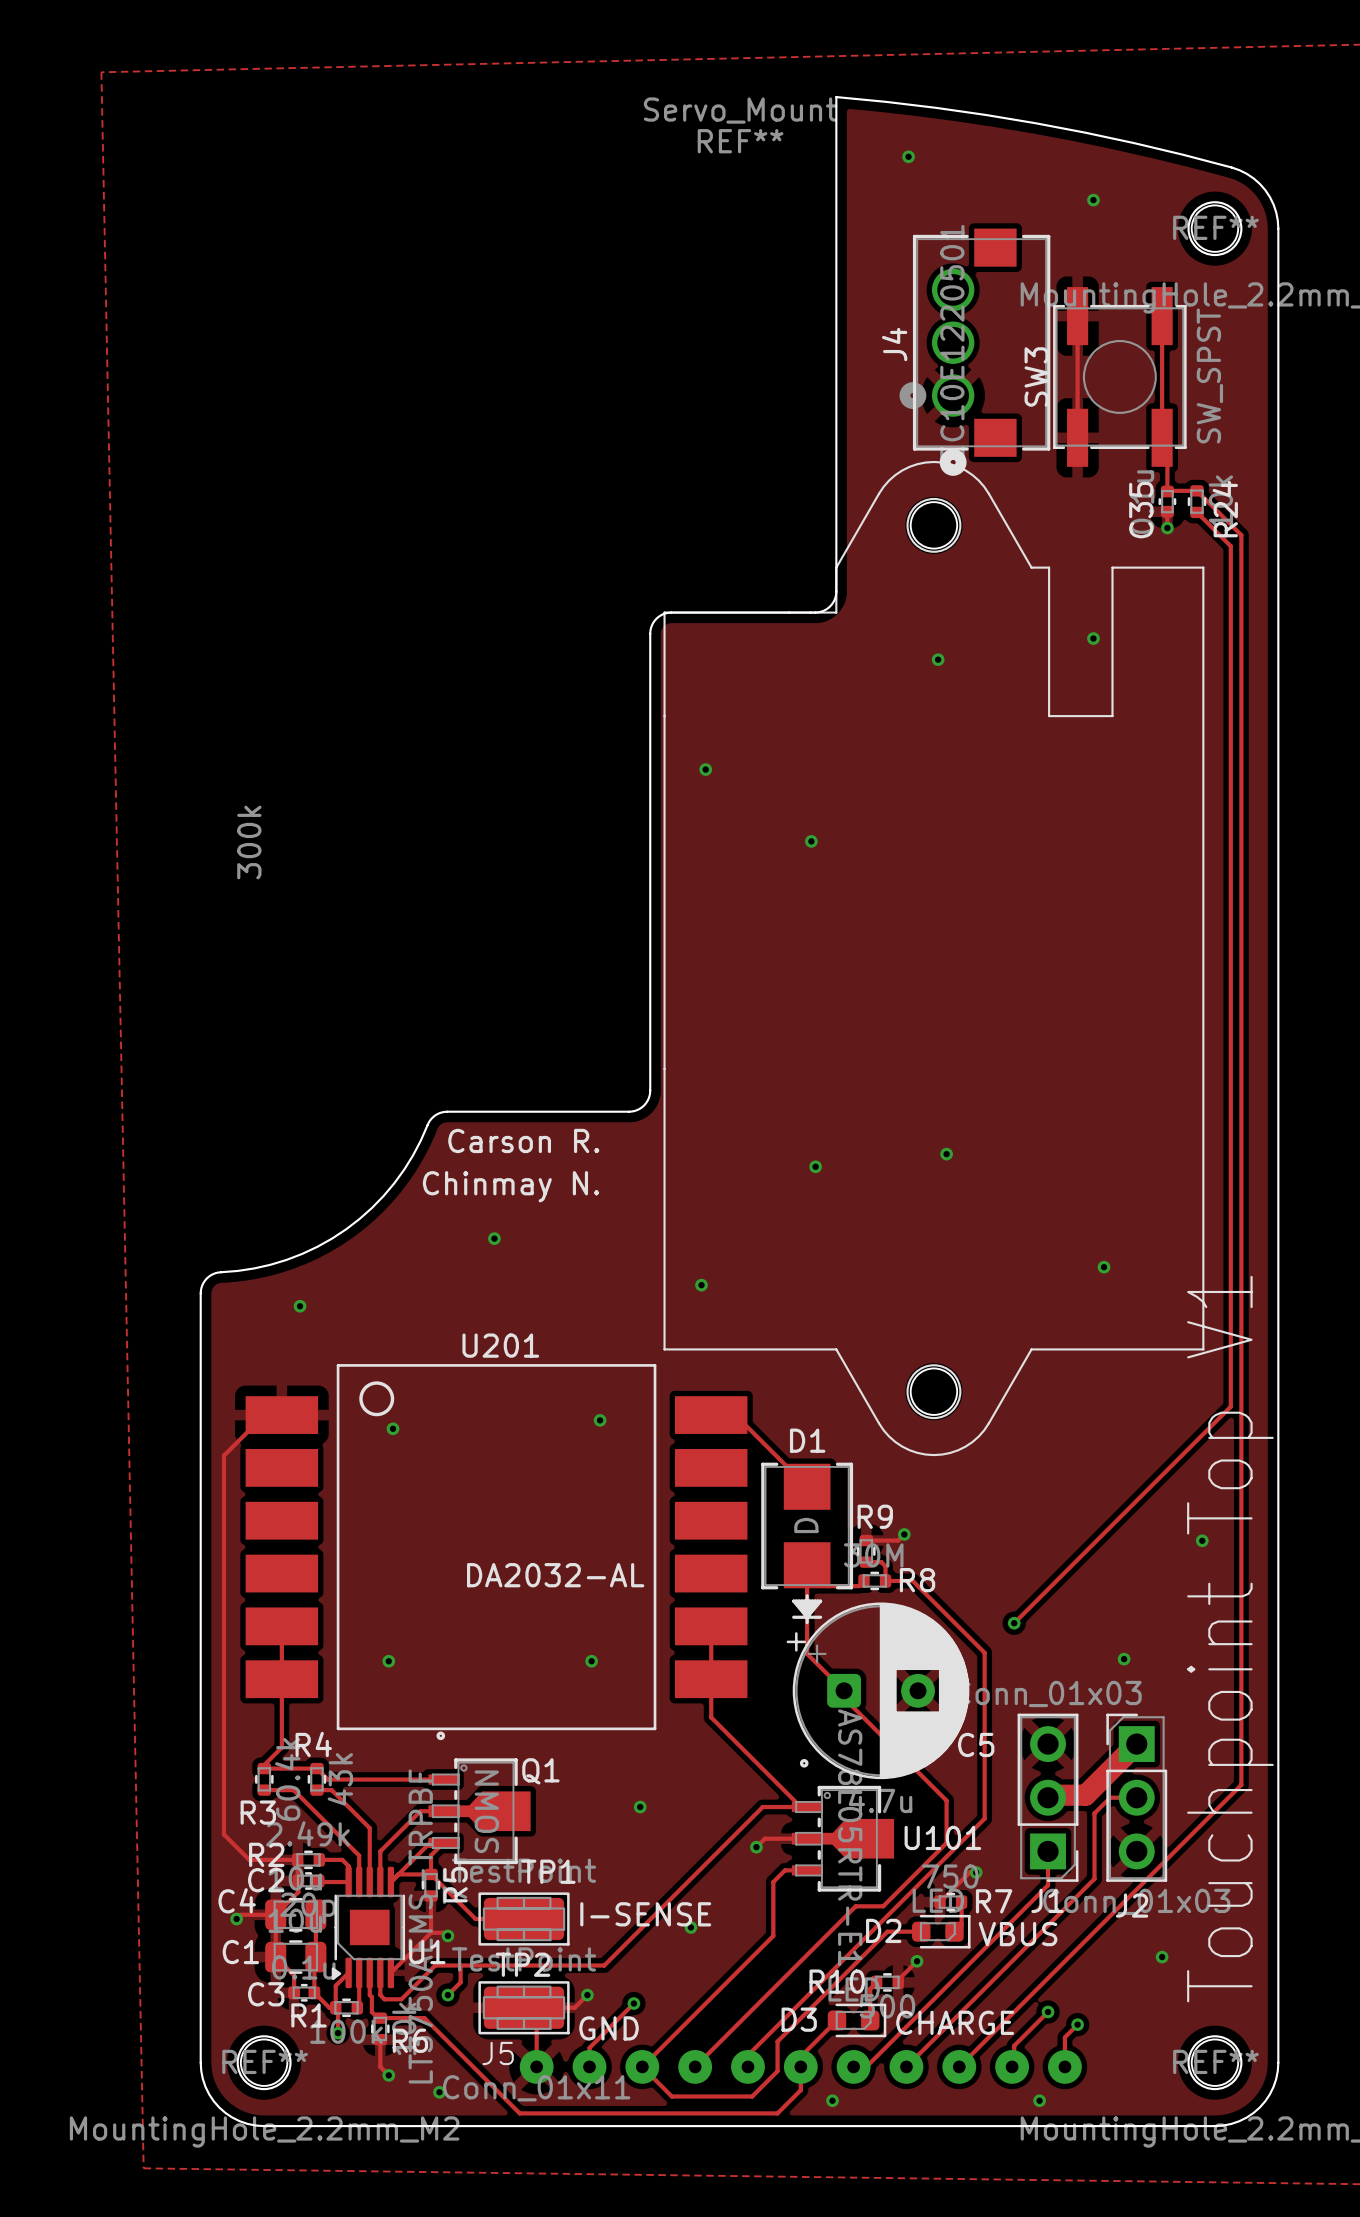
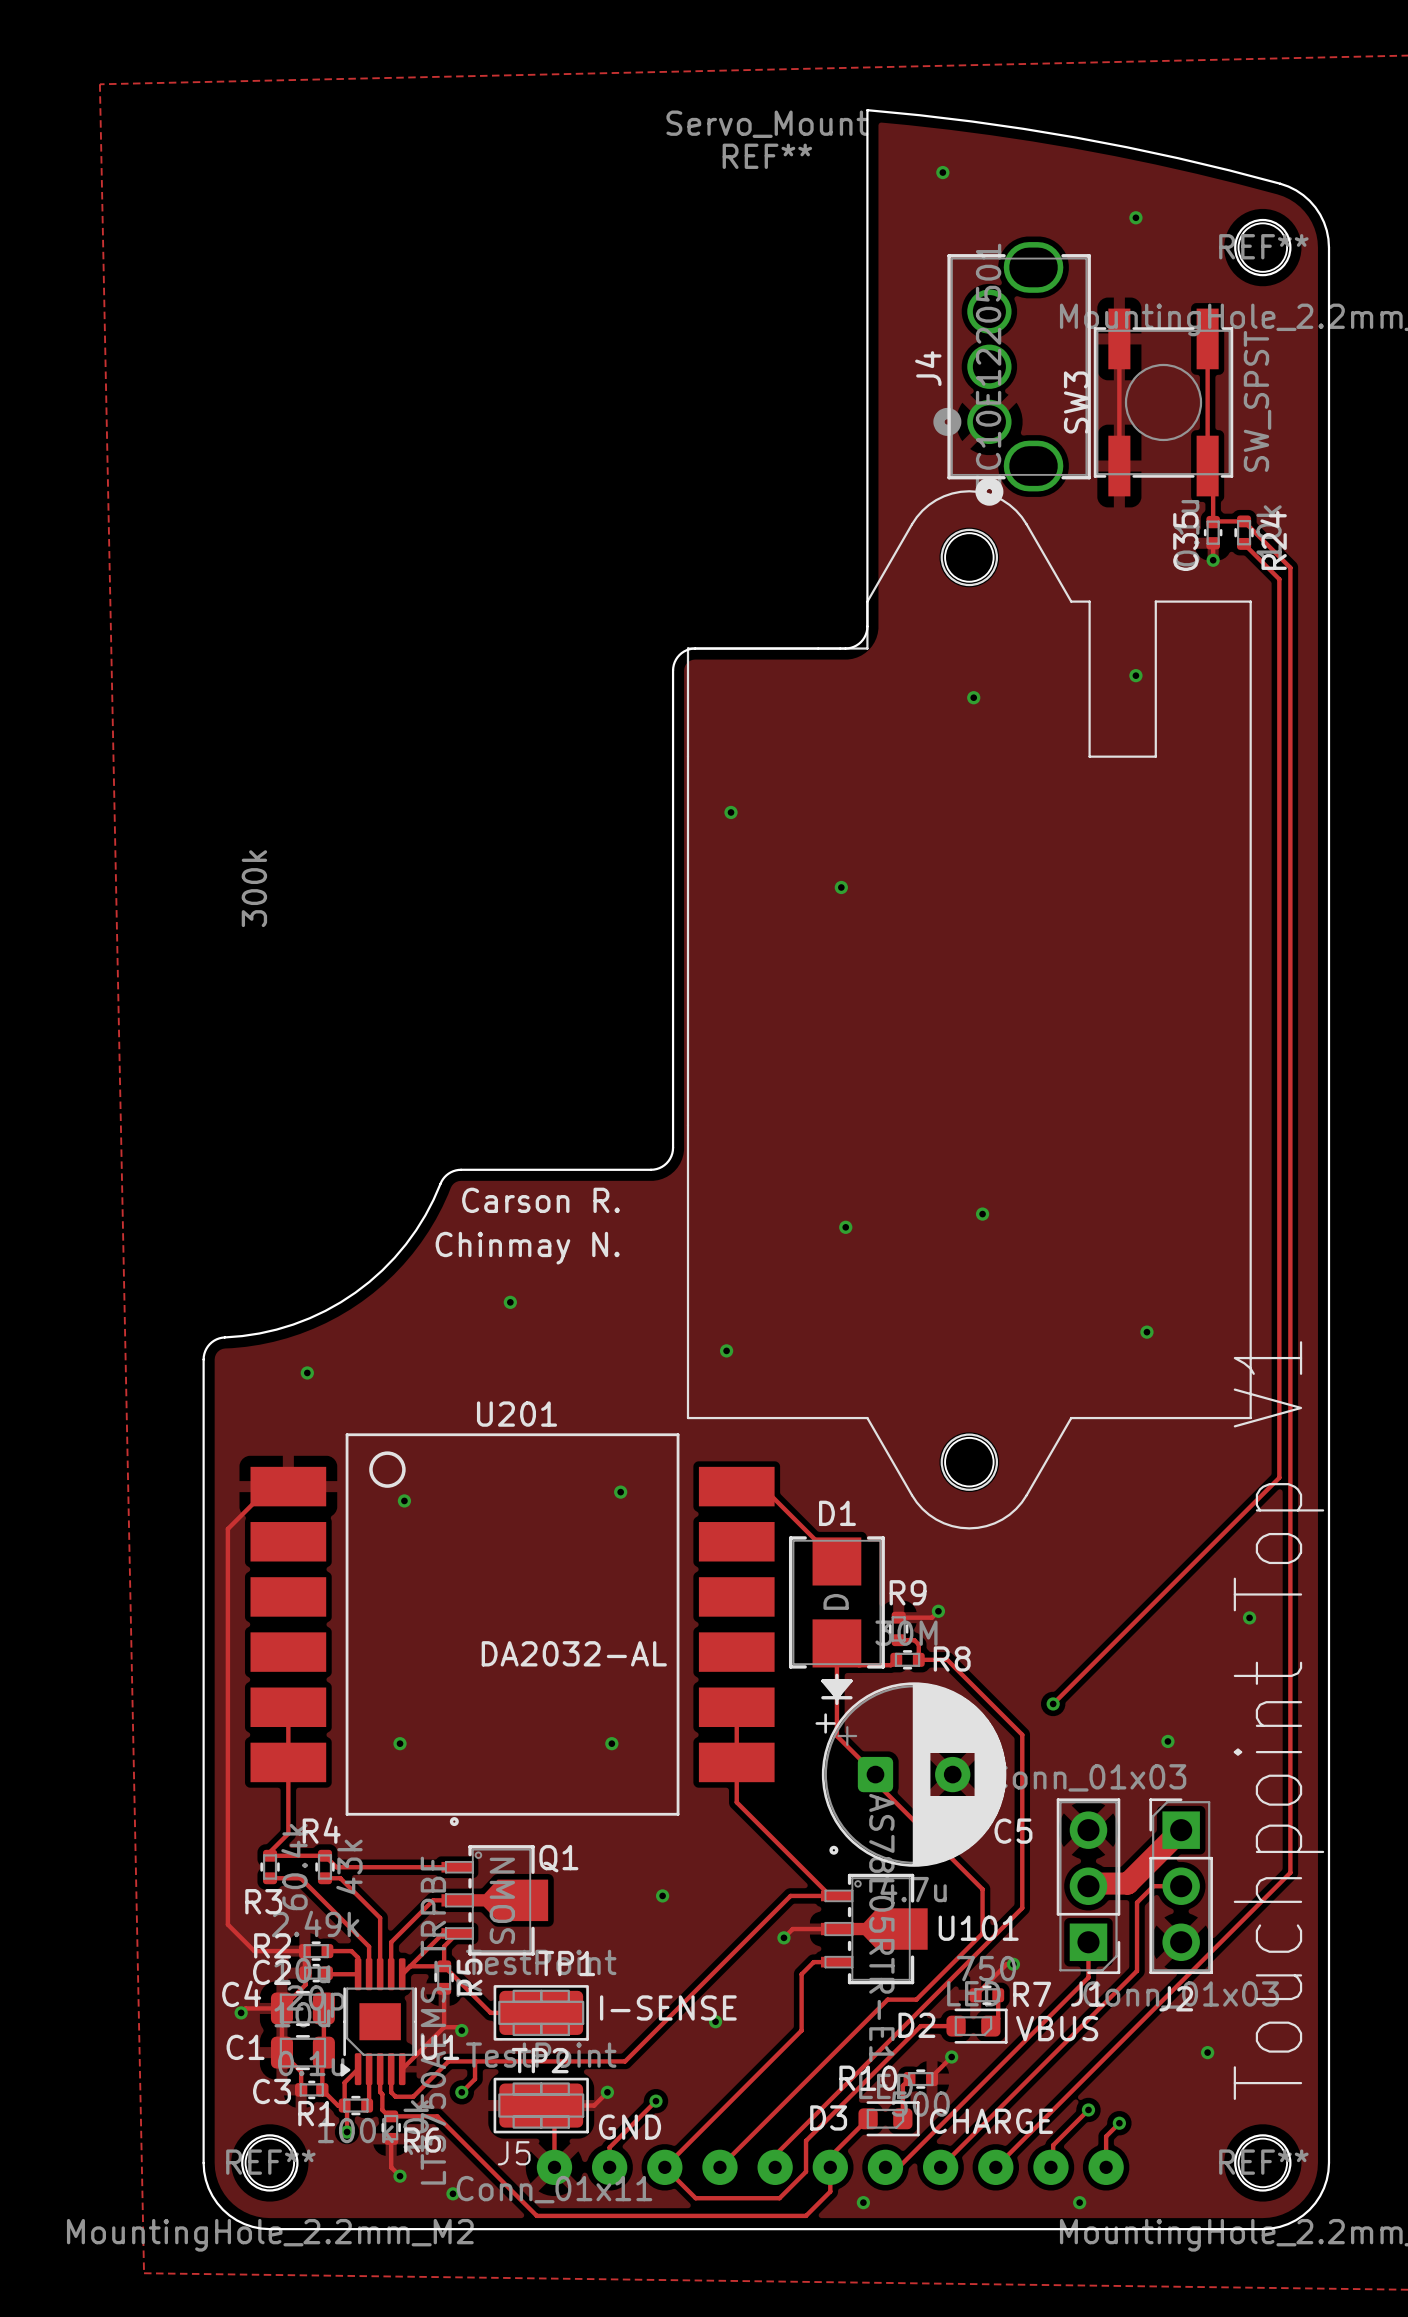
J4 footprint: [899, 228, 1051, 476] -> [933, 242, 1091, 506]

